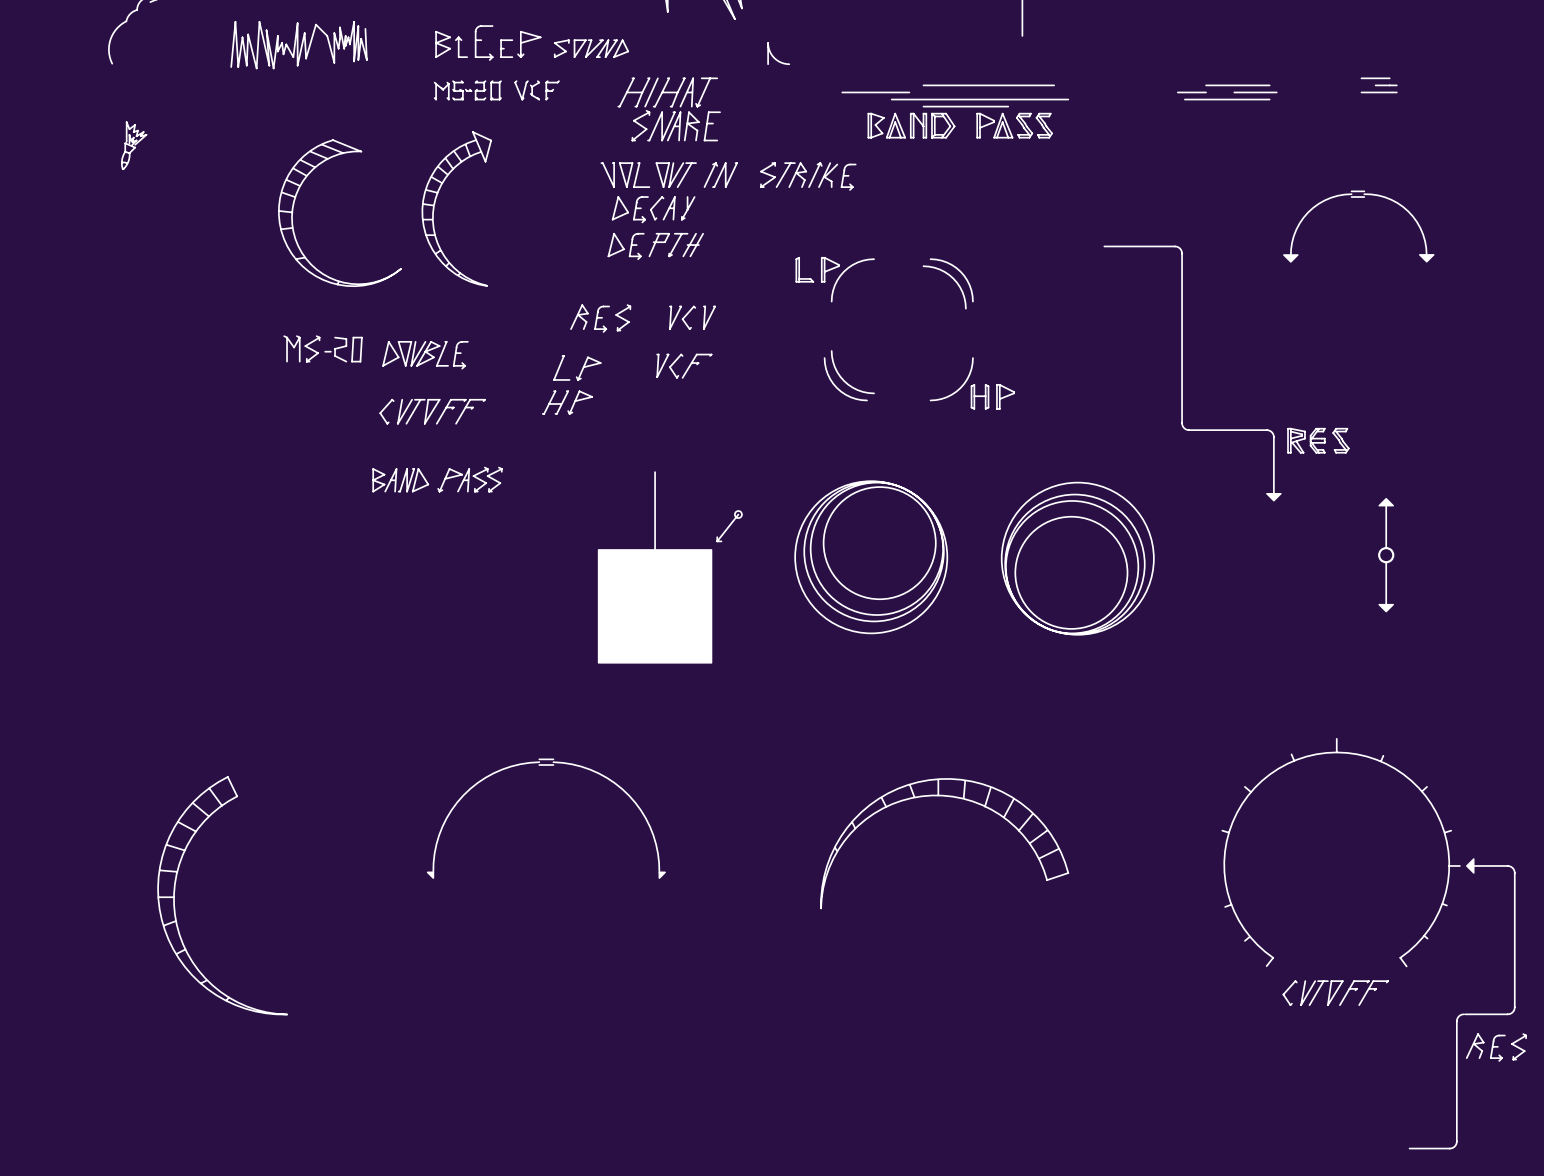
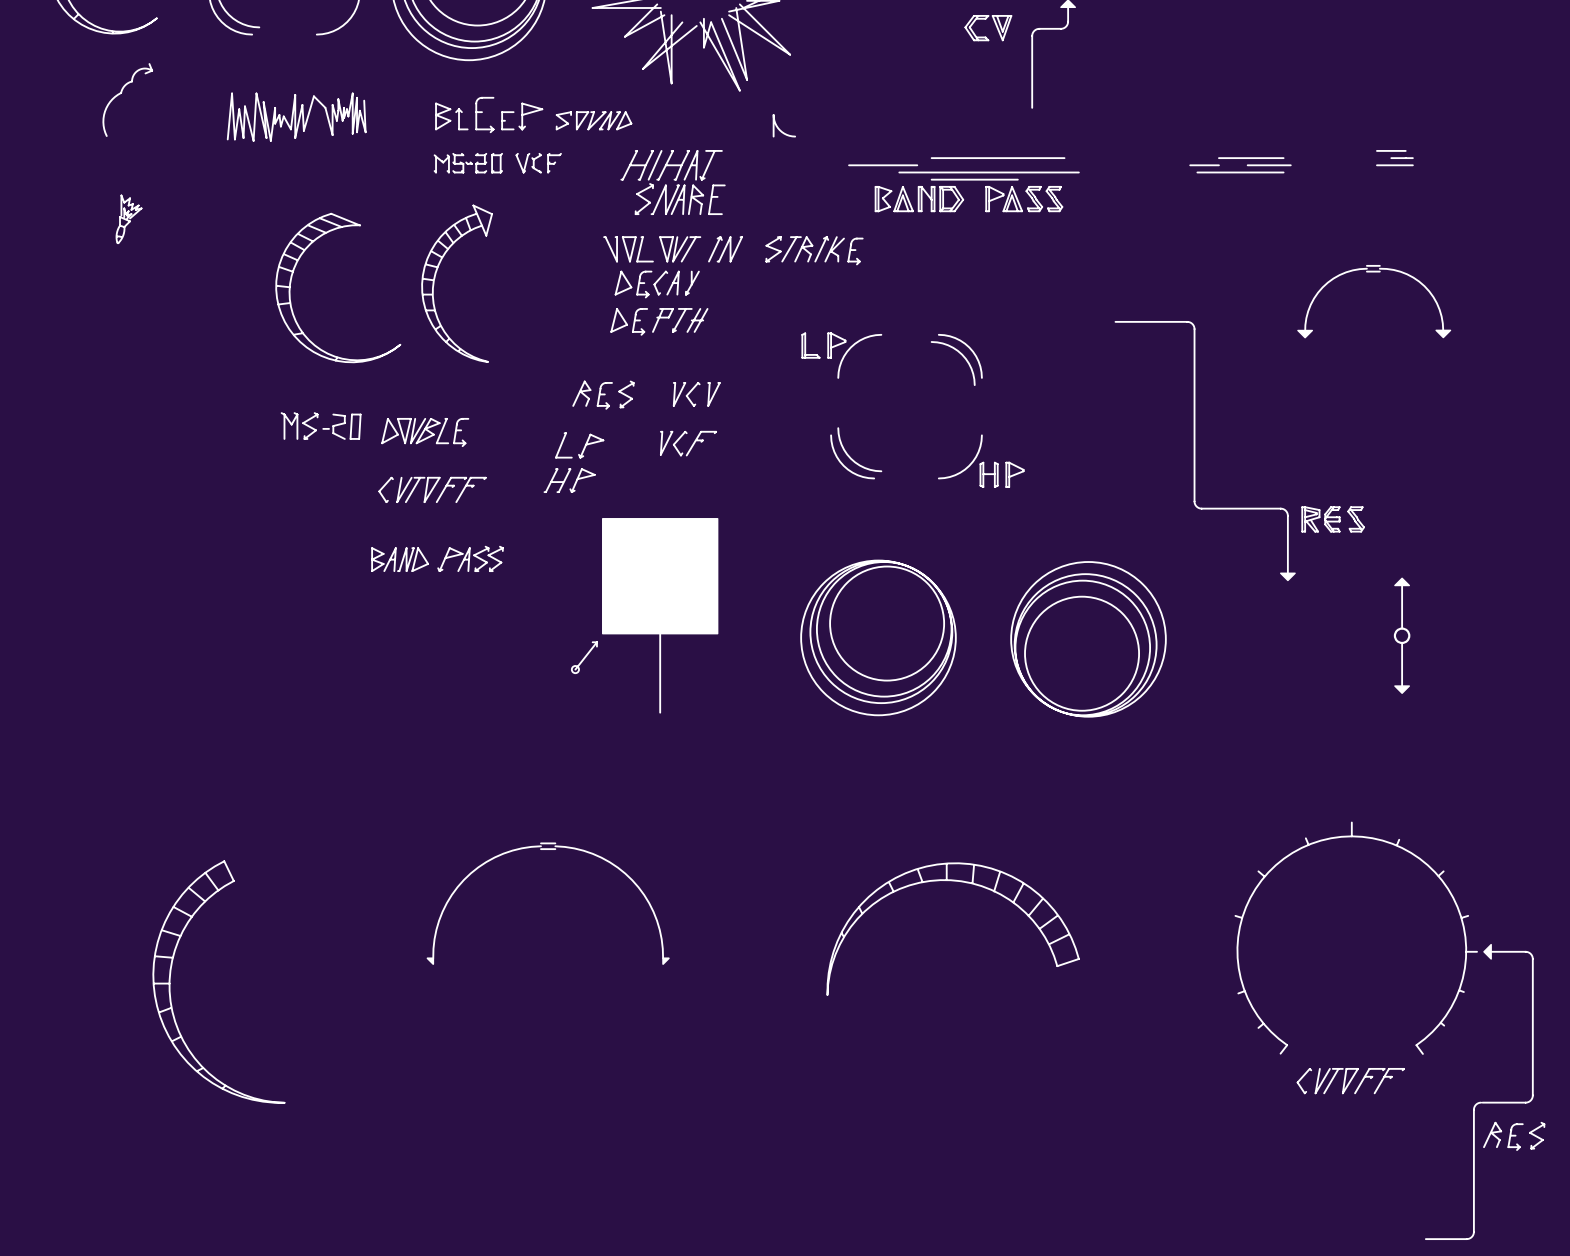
line: (655, 472) (655, 560) -> (660, 622) (660, 712)
line: (738, 514) (717, 541) -> (596, 642) (575, 669)
drawing position: (738, 514) -> (575, 669)
line: (717, 537) (717, 541) -> (596, 642) (596, 646)
line: (717, 541) (721, 541) -> (592, 642) (596, 642)
drawing position: (655, 606) -> (660, 576)

